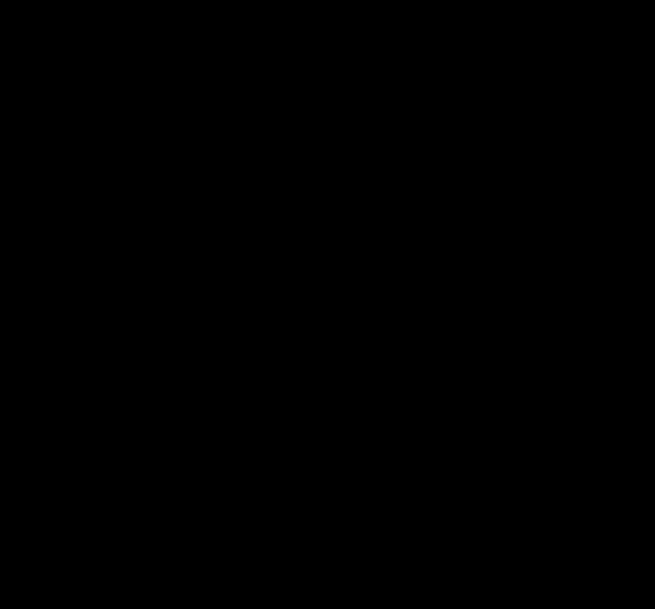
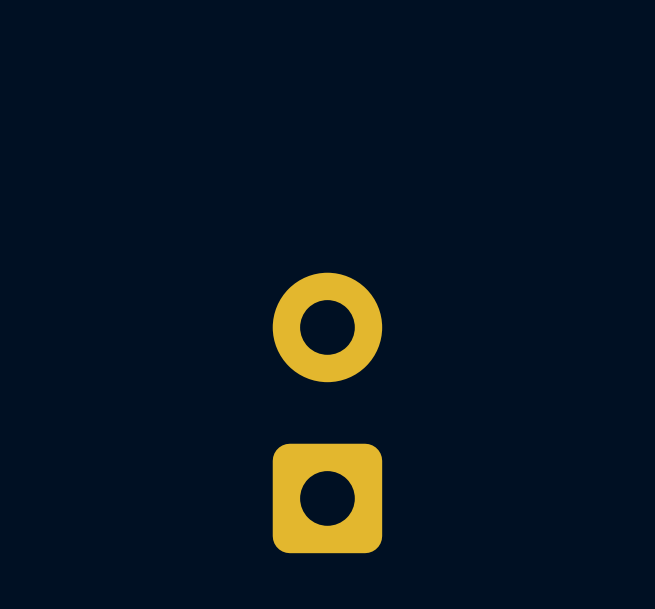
part: none -> (327, 412)

